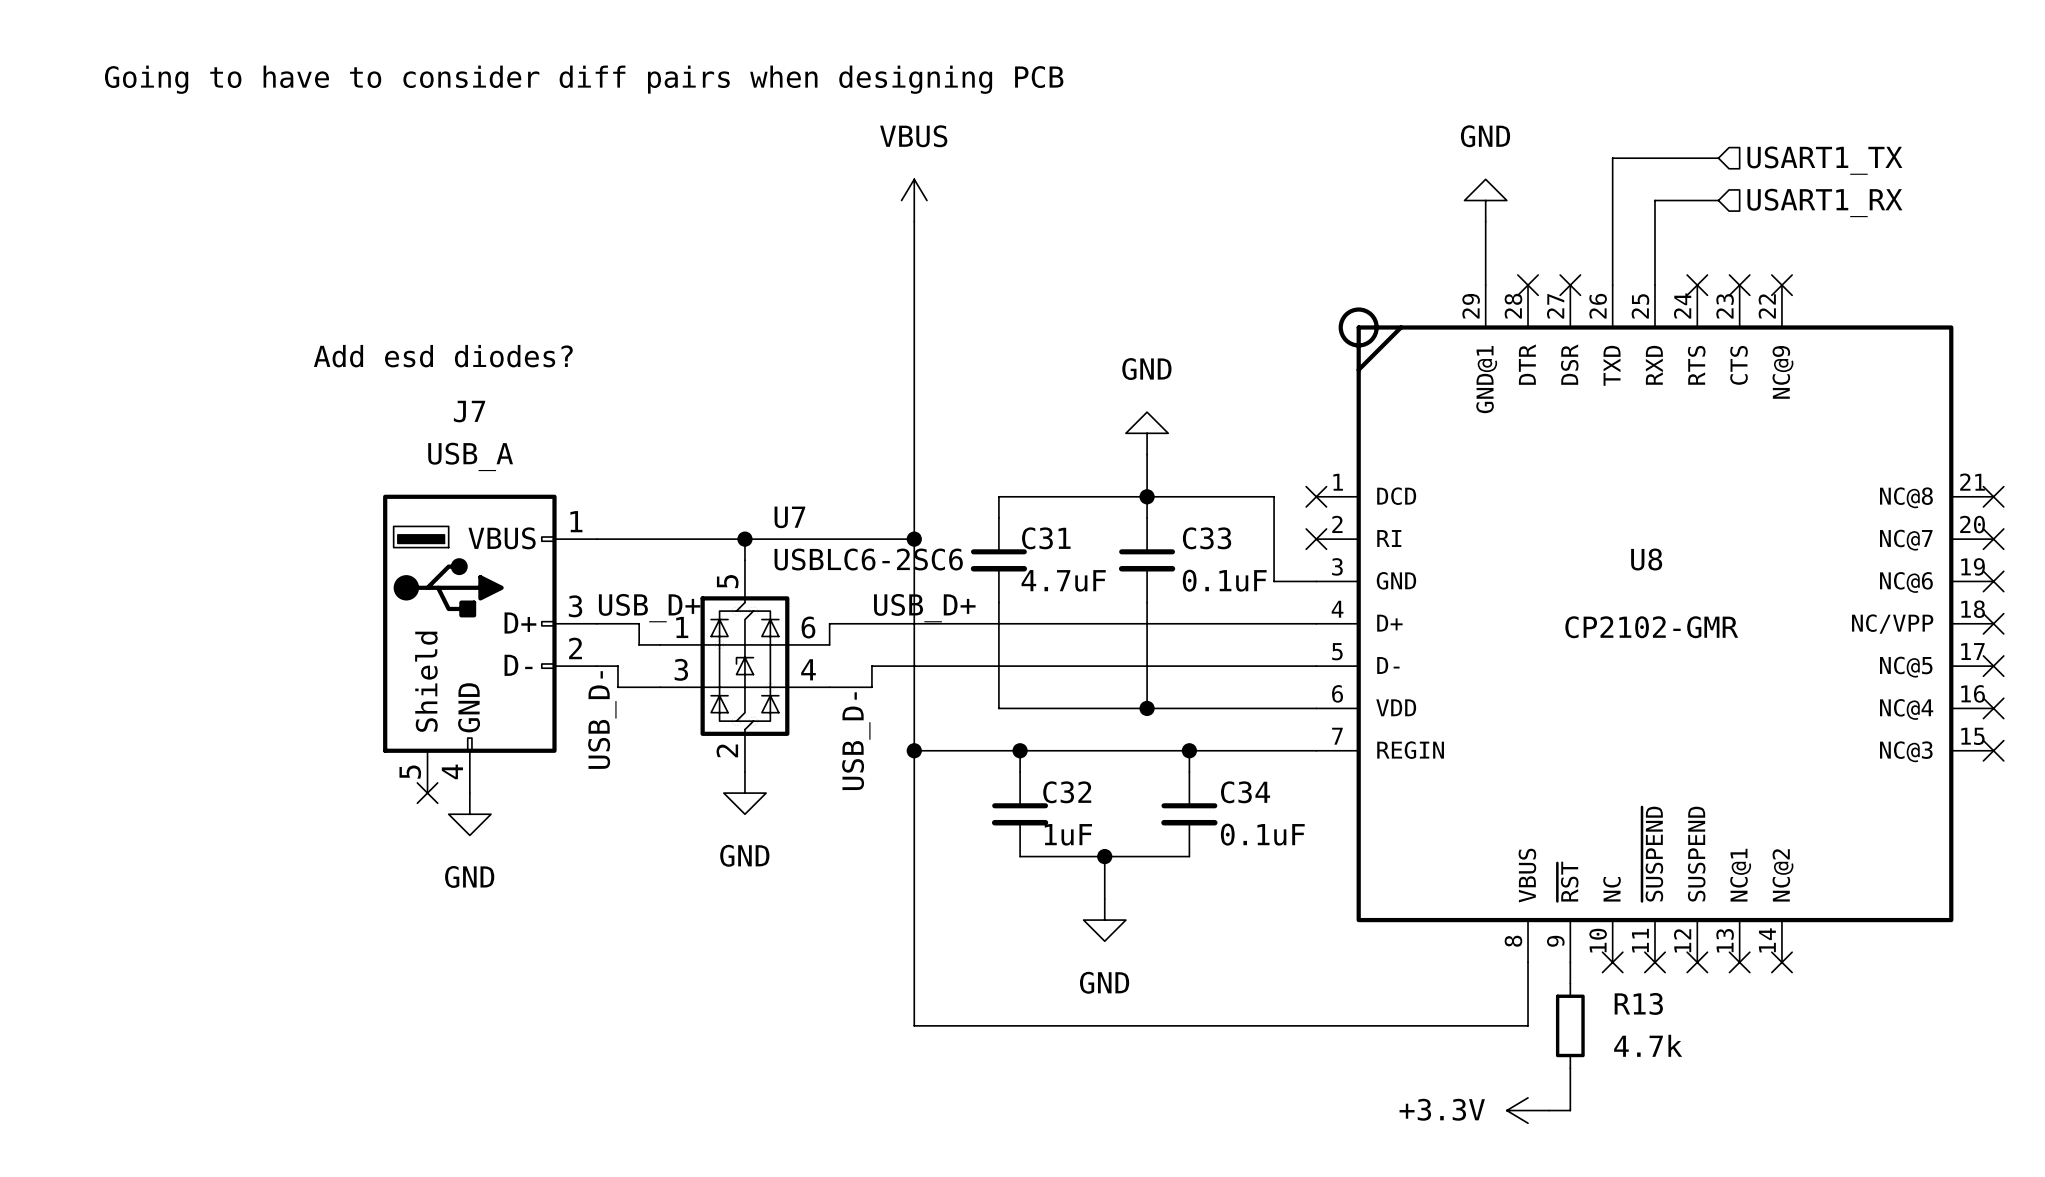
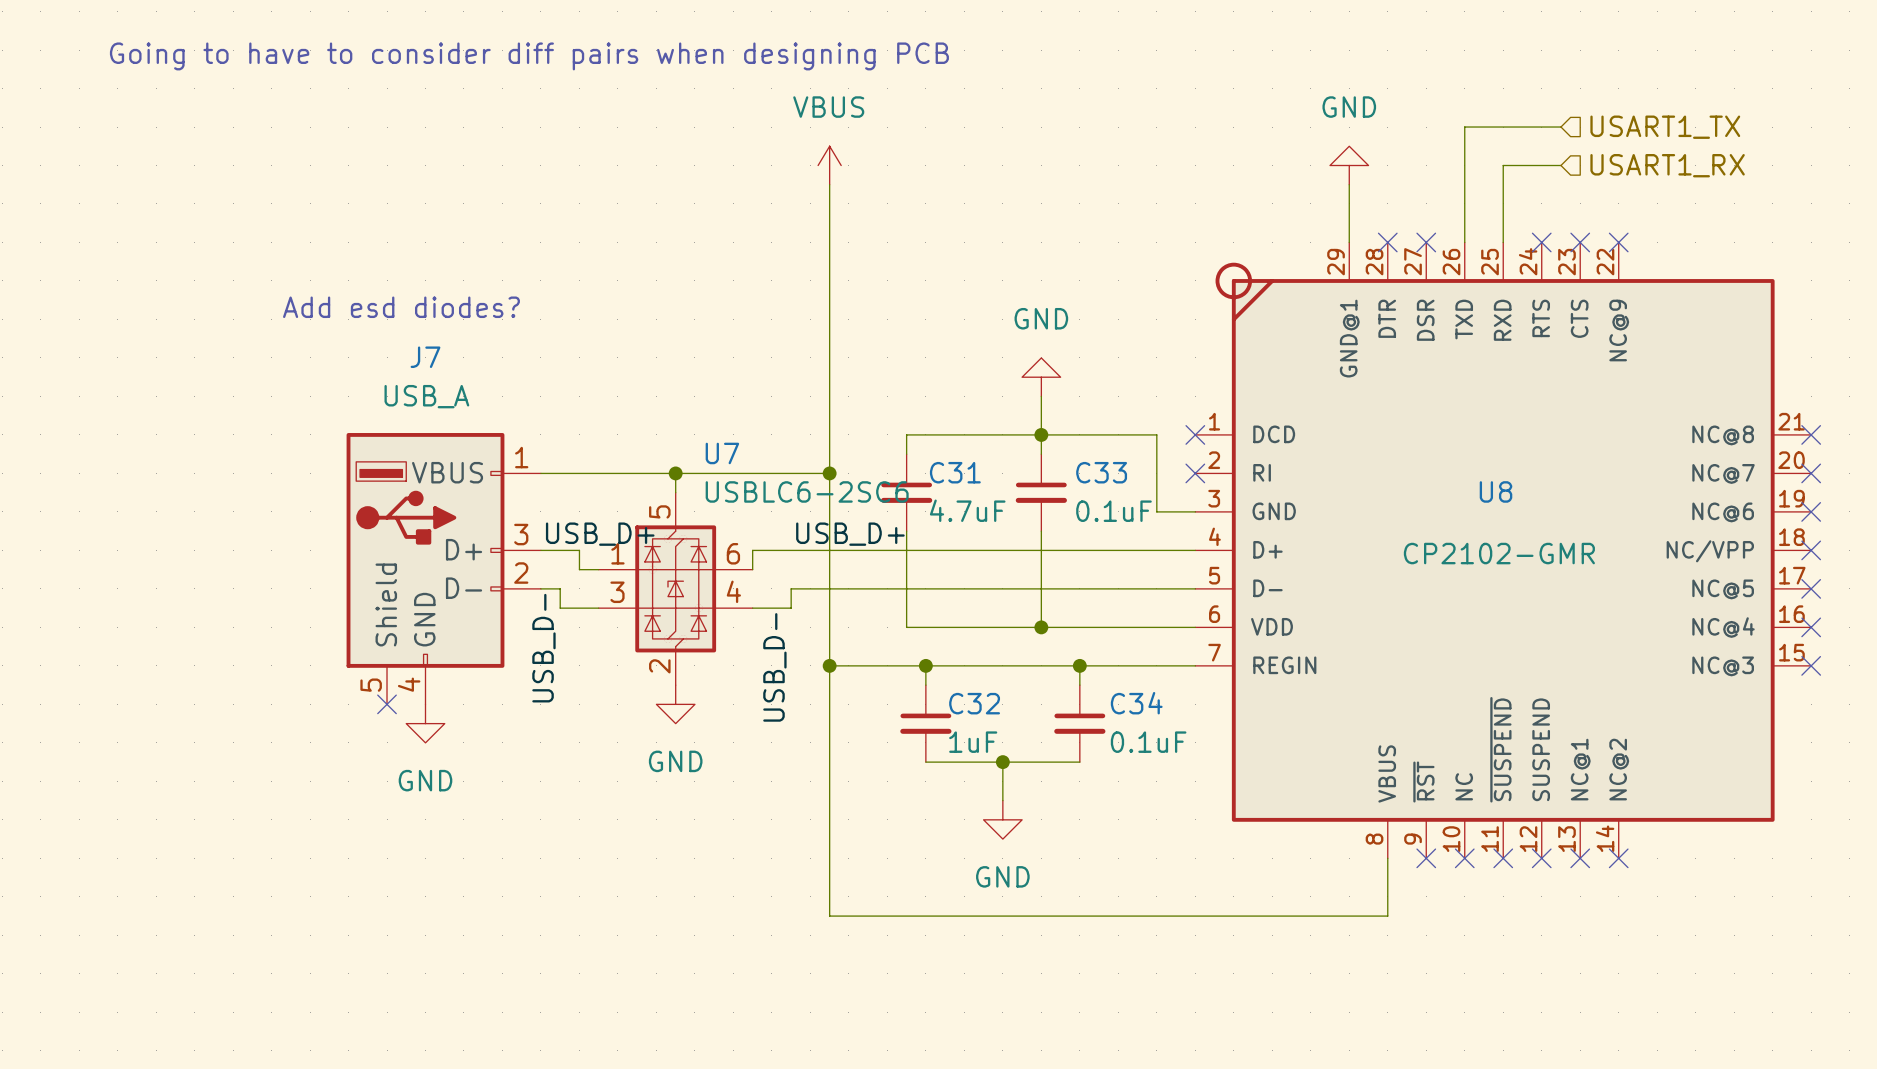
wire: (1570, 962) (1570, 983) -> none
no-connect mark: none -> (1426, 858)
R13: 4.7k (1570, 1025) -> none
wire: (1570, 1068) (1570, 1110) (1549, 1110) -> none
power symbol: +3.3V (1528, 1110) -> none

